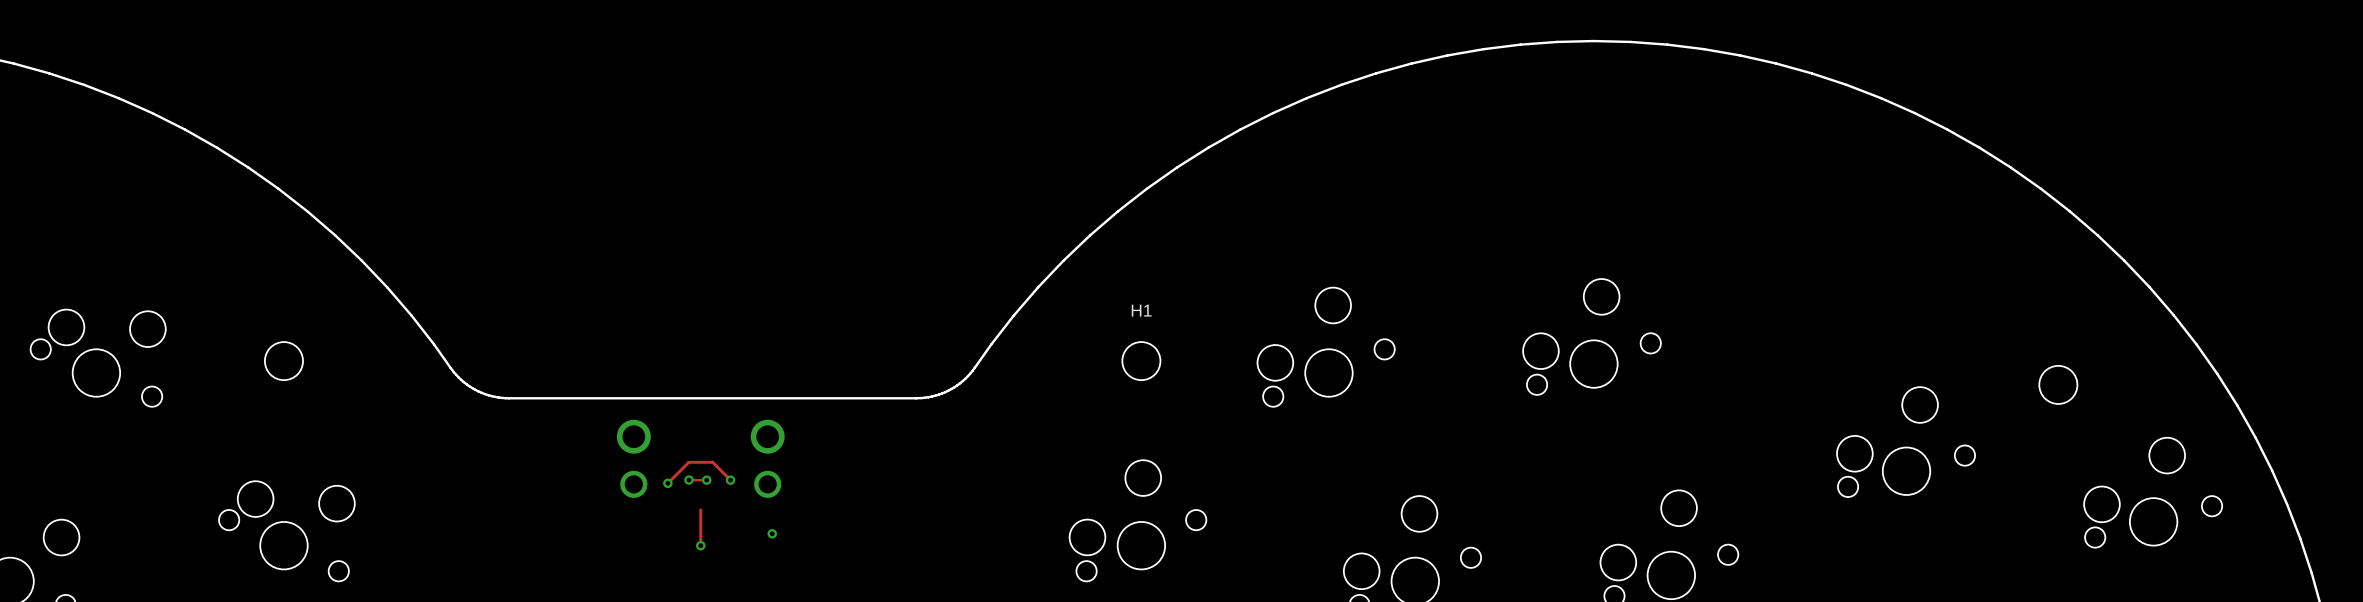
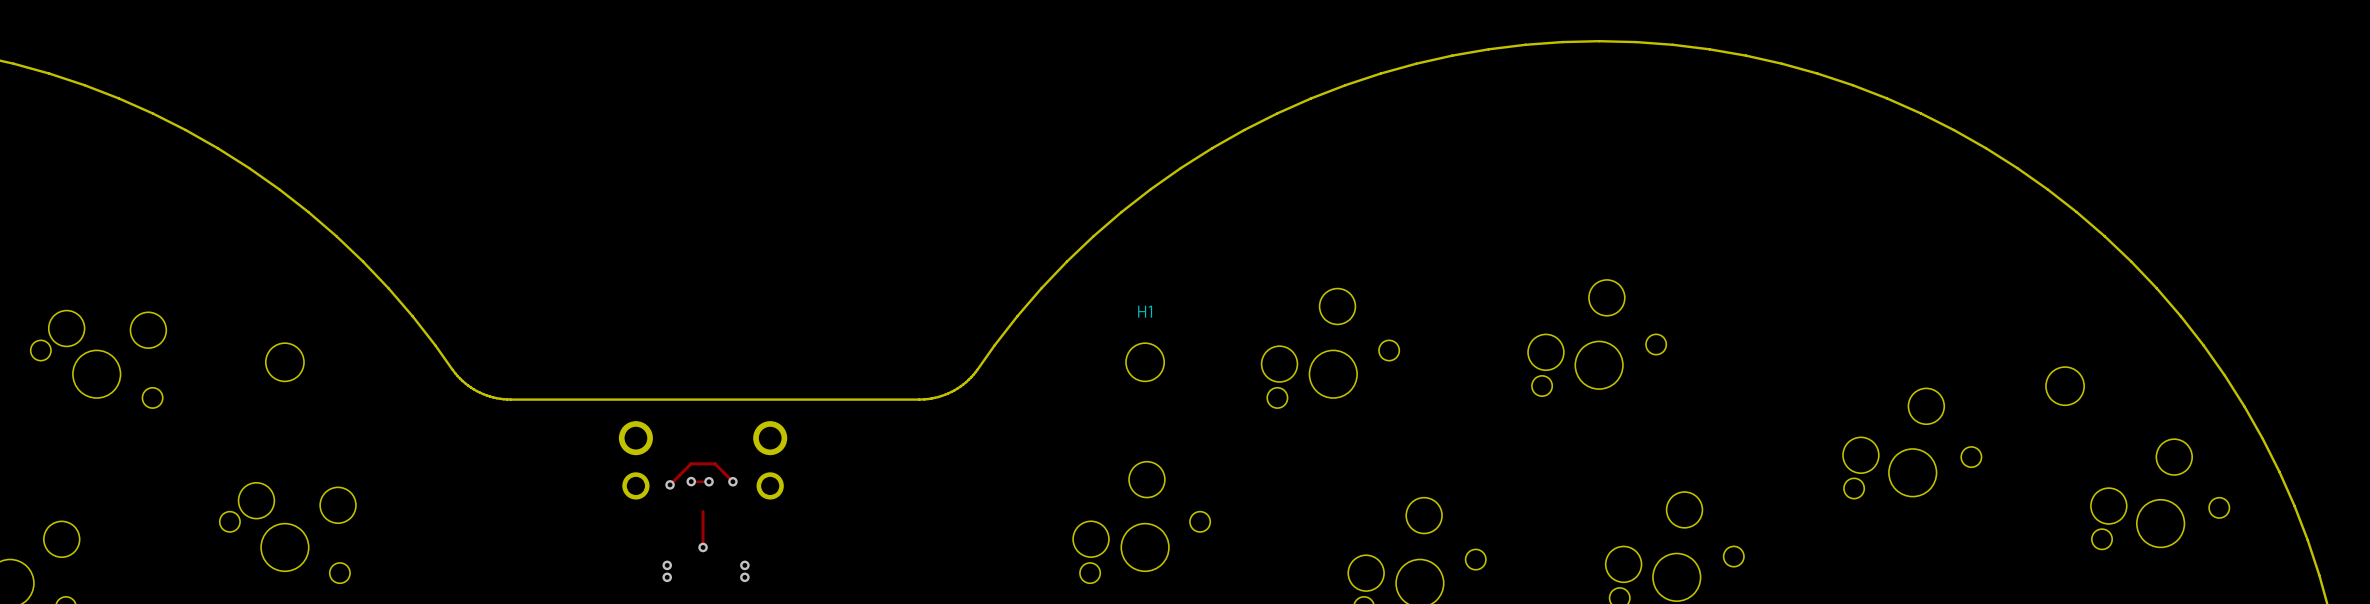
via: (772, 533) -> none
via: none -> (667, 565)
via: none -> (744, 565)
via: none -> (667, 577)
via: none -> (744, 577)

